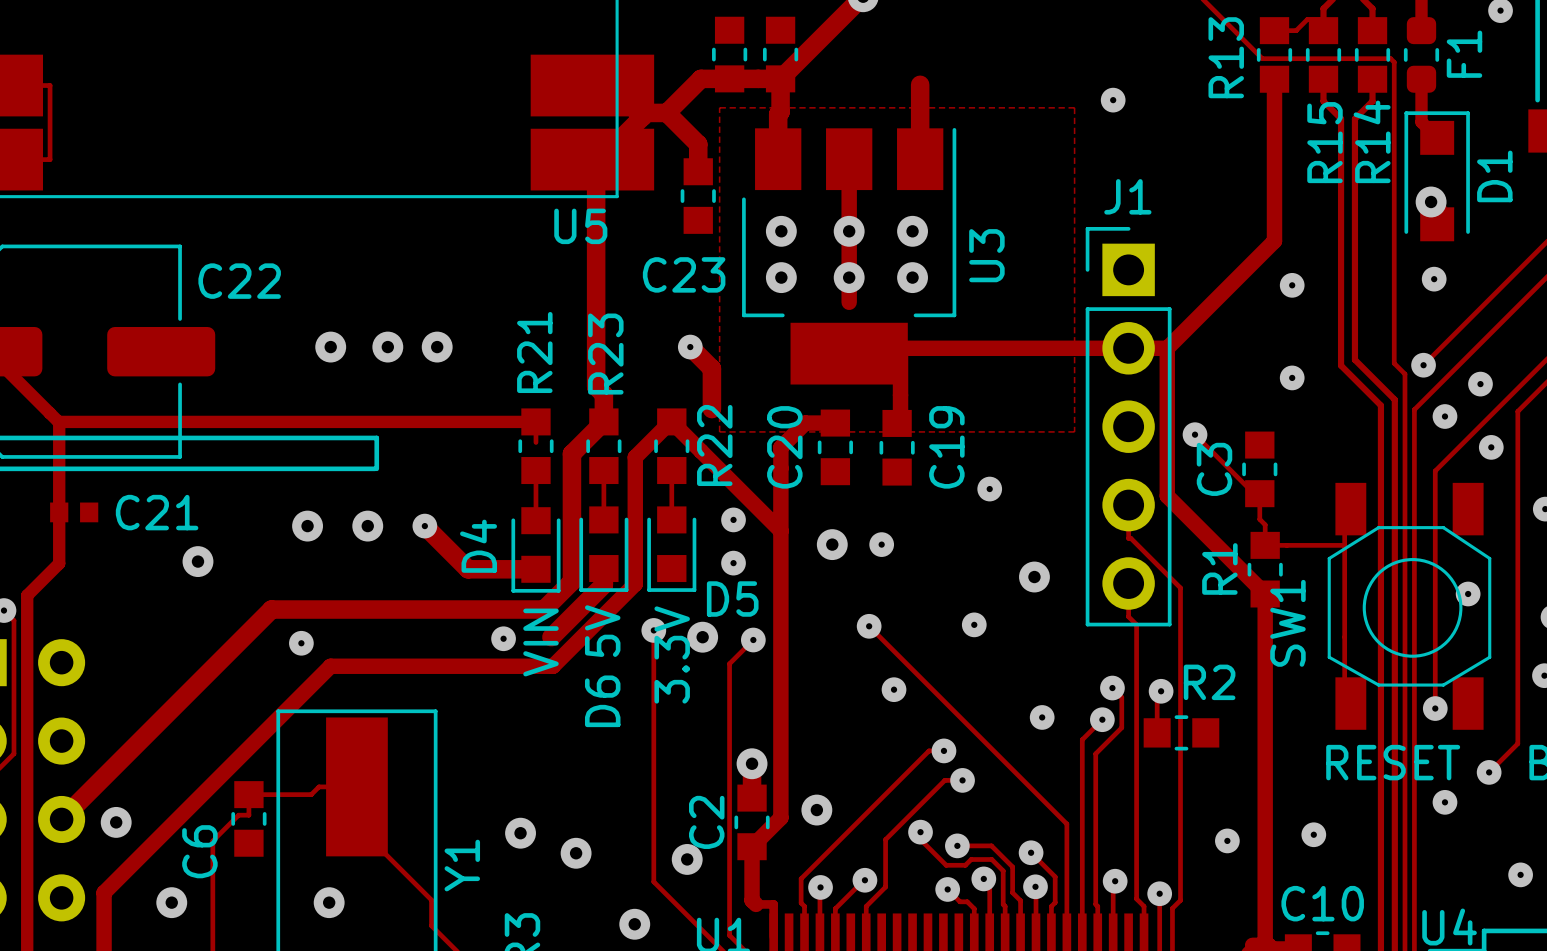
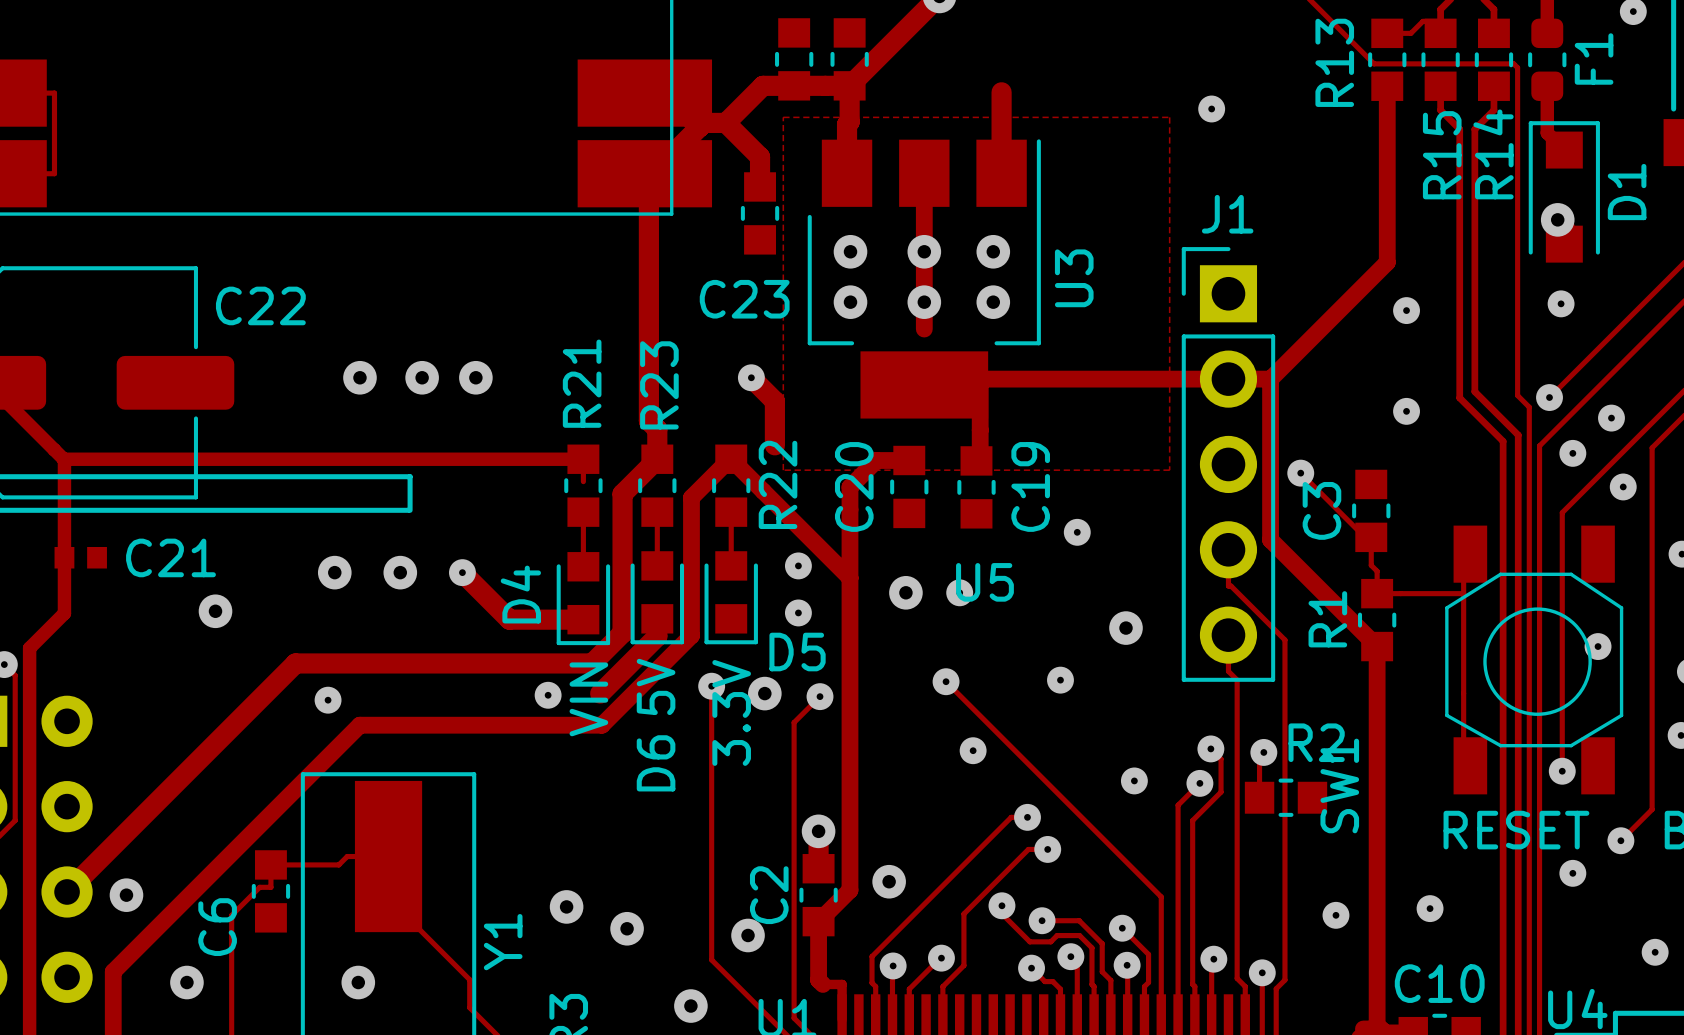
U5 name position: U5 (580, 226) -> U5 (984, 582)
SW1 name position: SW1 (1287, 623) -> SW1 (1339, 785)

